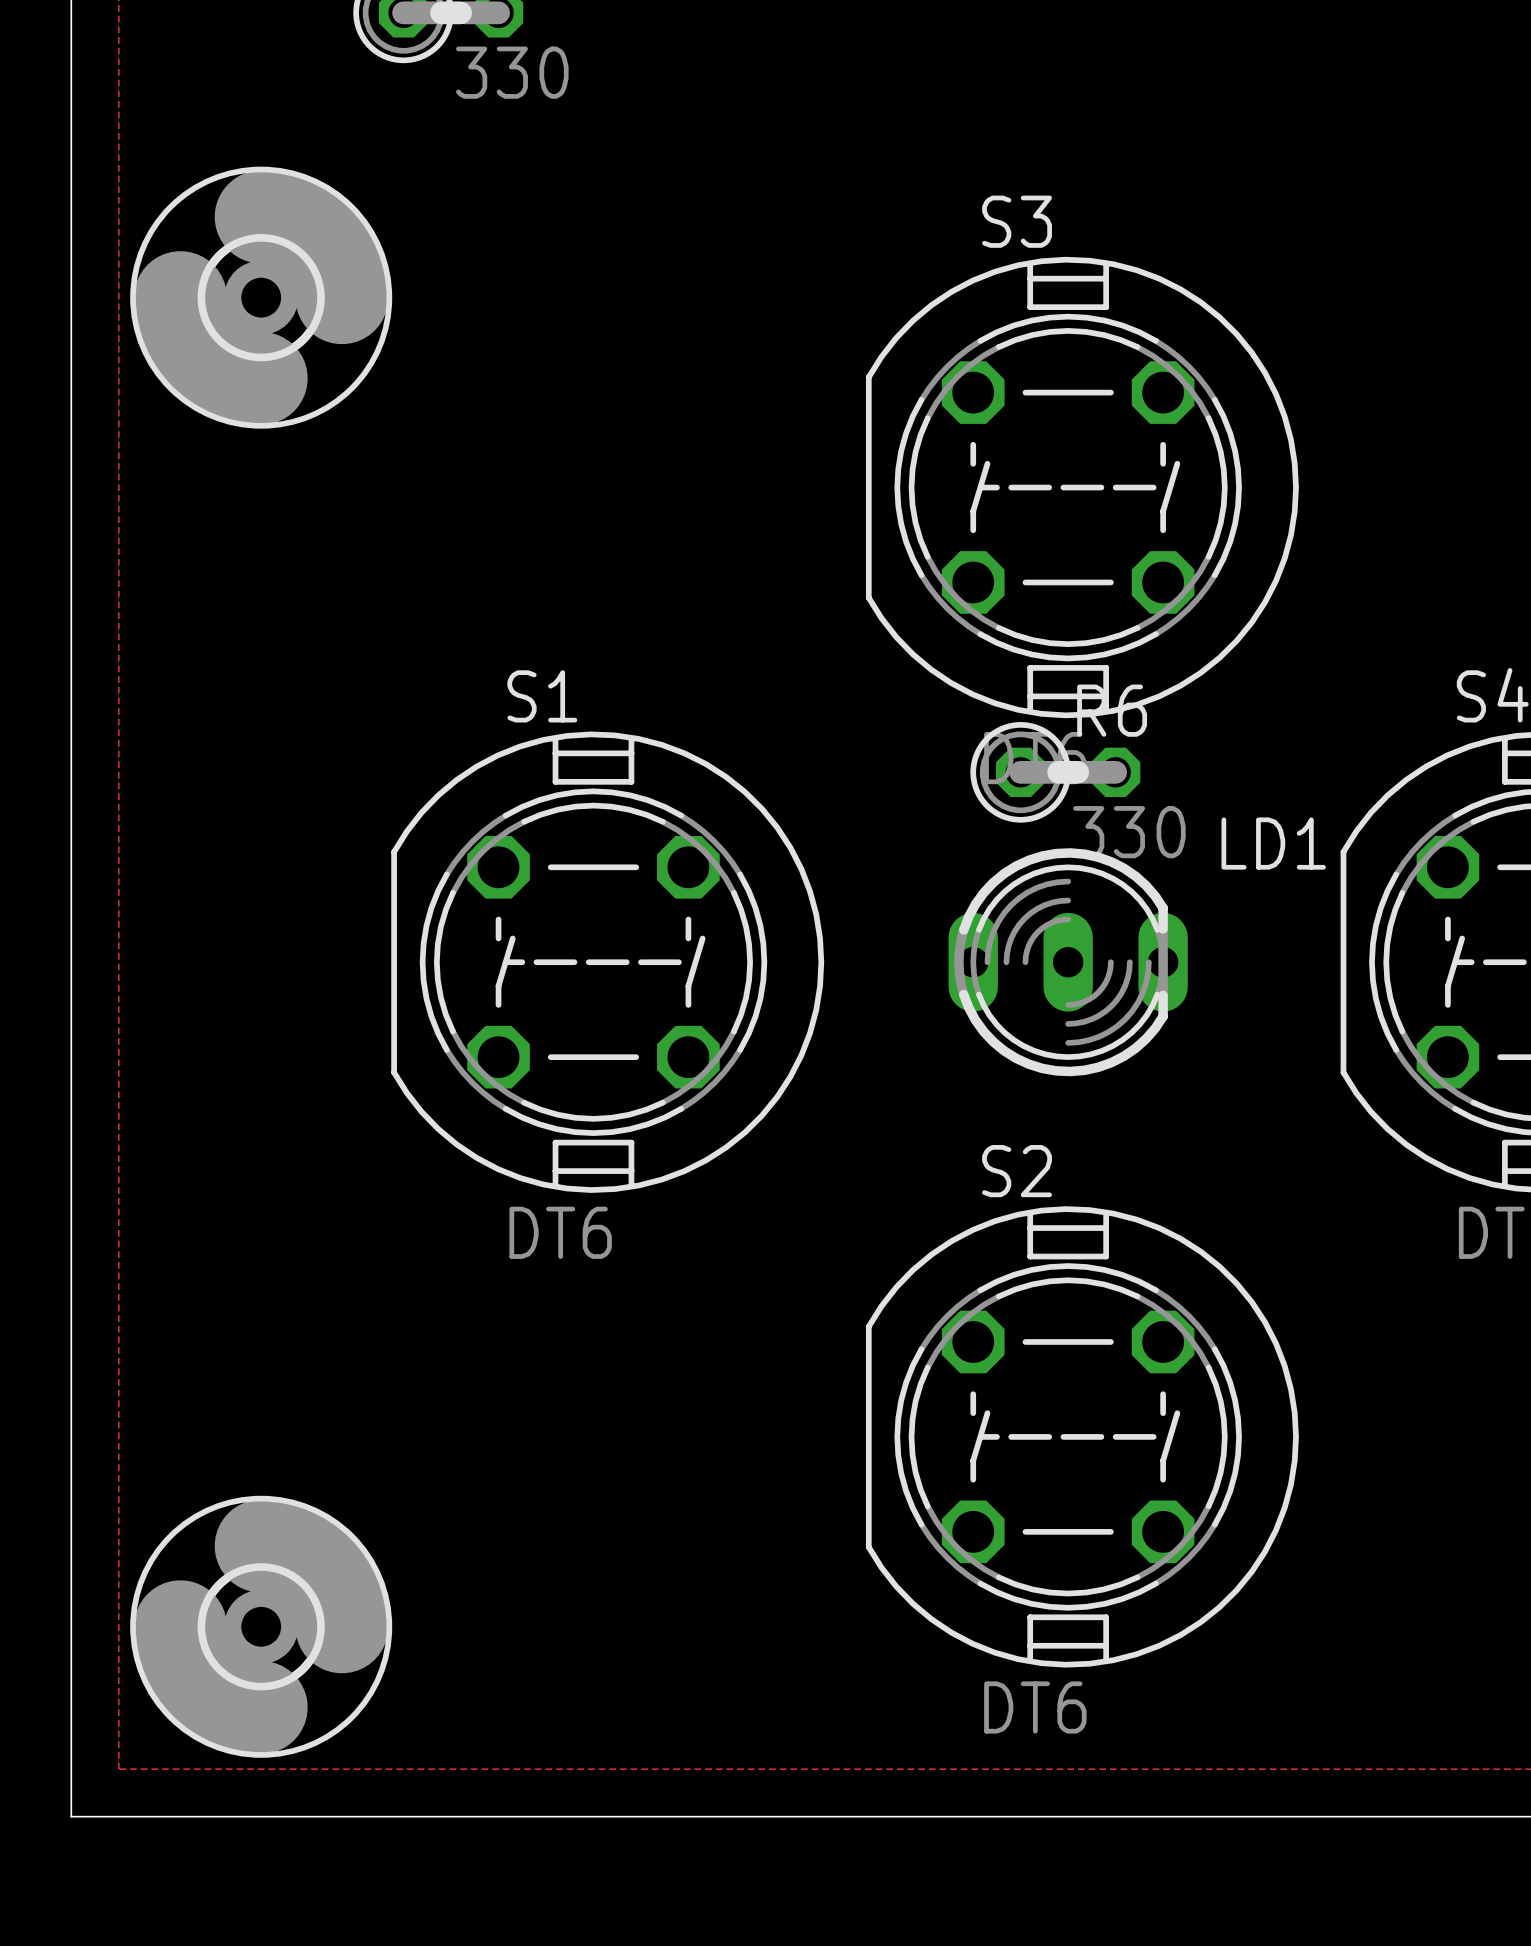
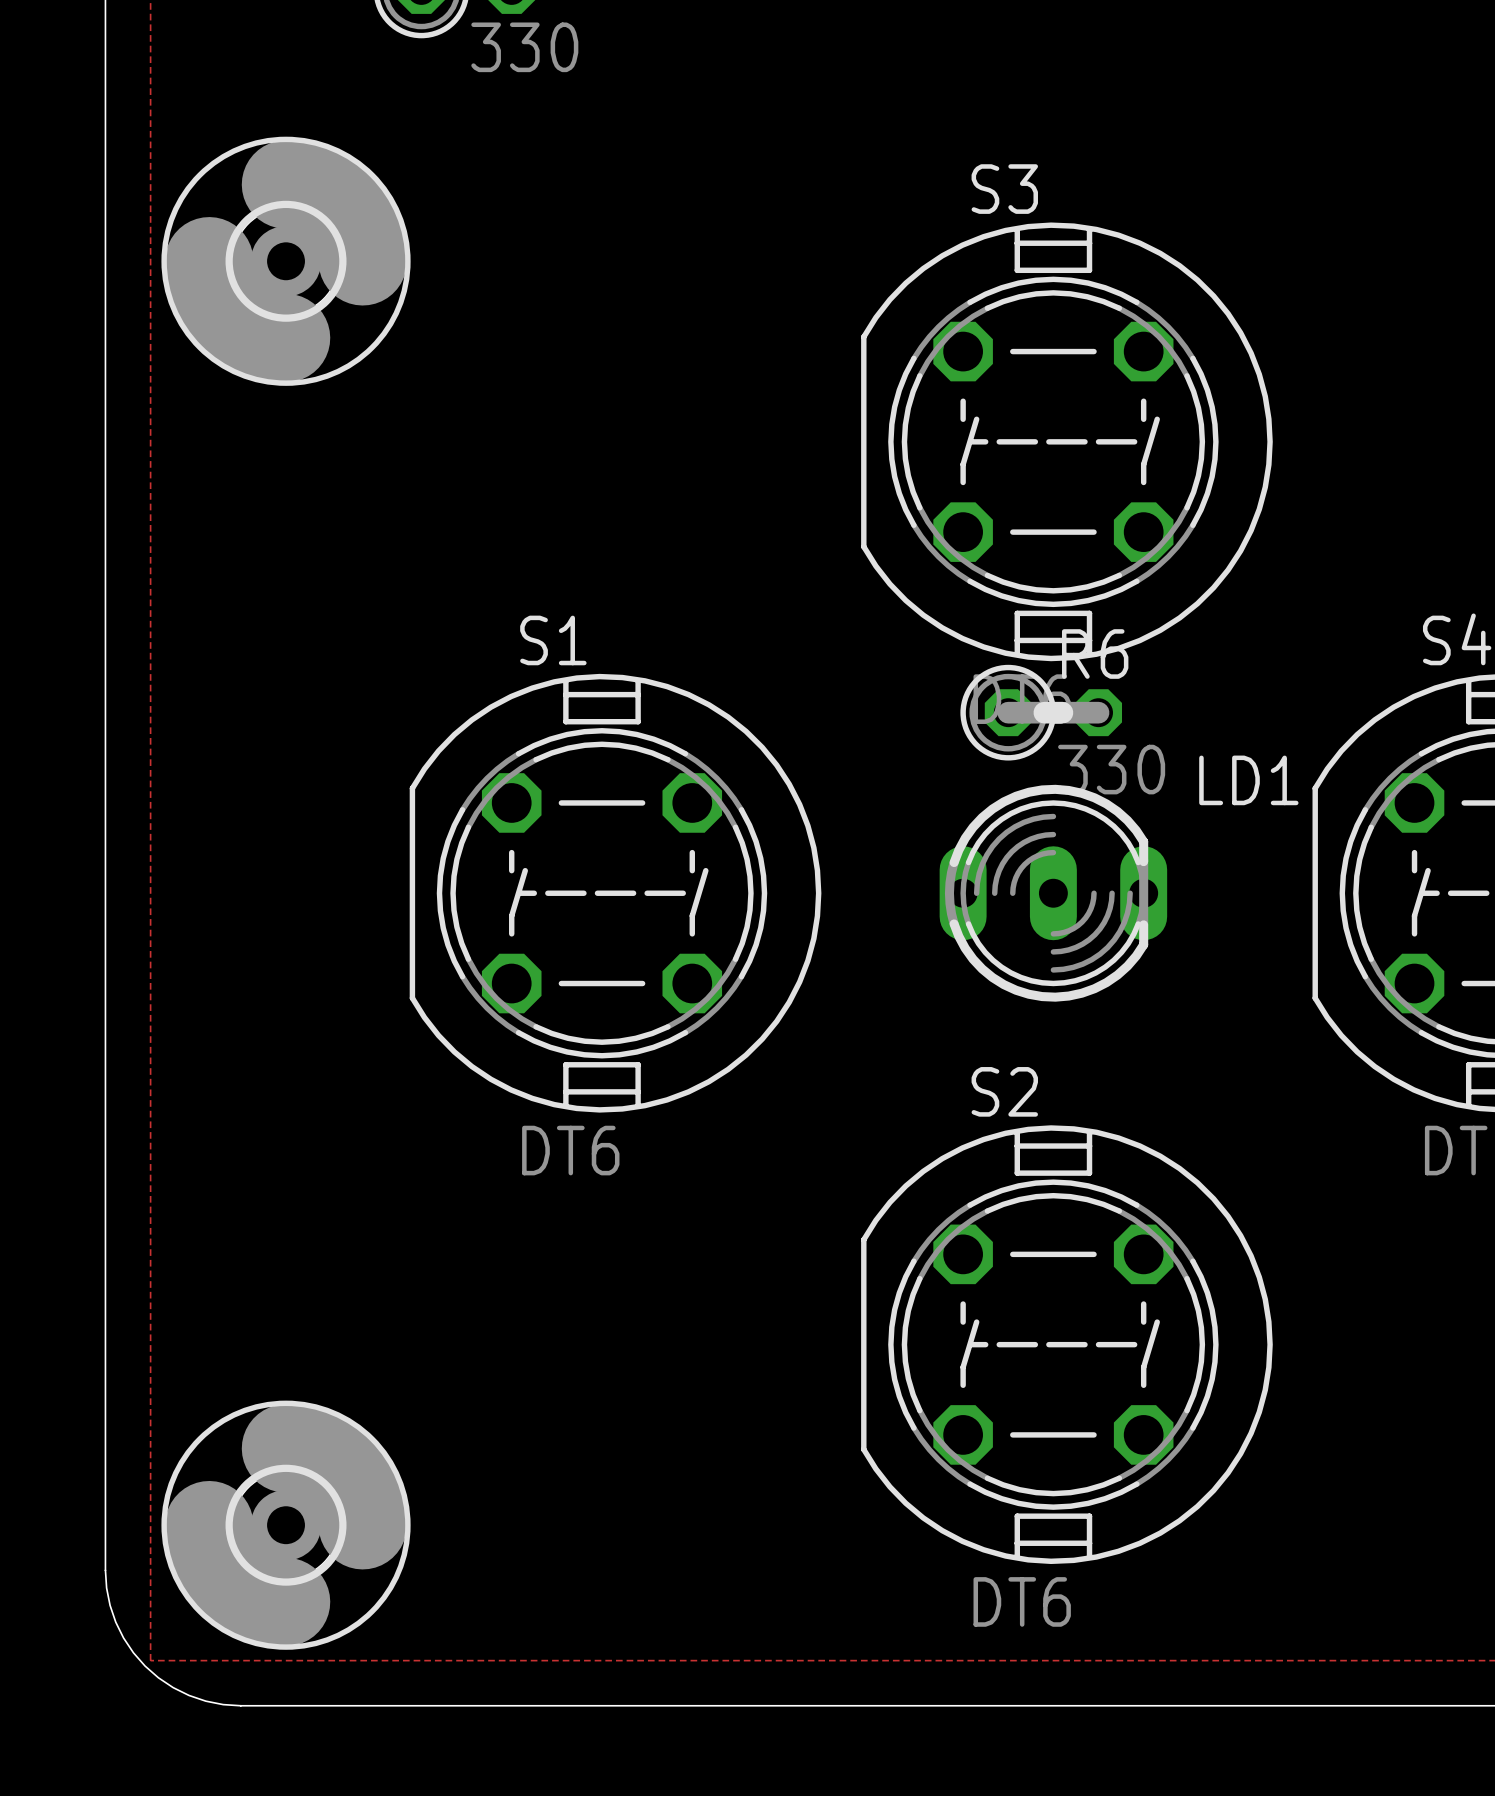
board edge: (71, 1674) (71, 1816) (213, 1816) -> (105, 1570) (110, 1605) (115, 1622) (123, 1638) (145, 1666) (173, 1687) (189, 1695) (205, 1701) (240, 1705)

